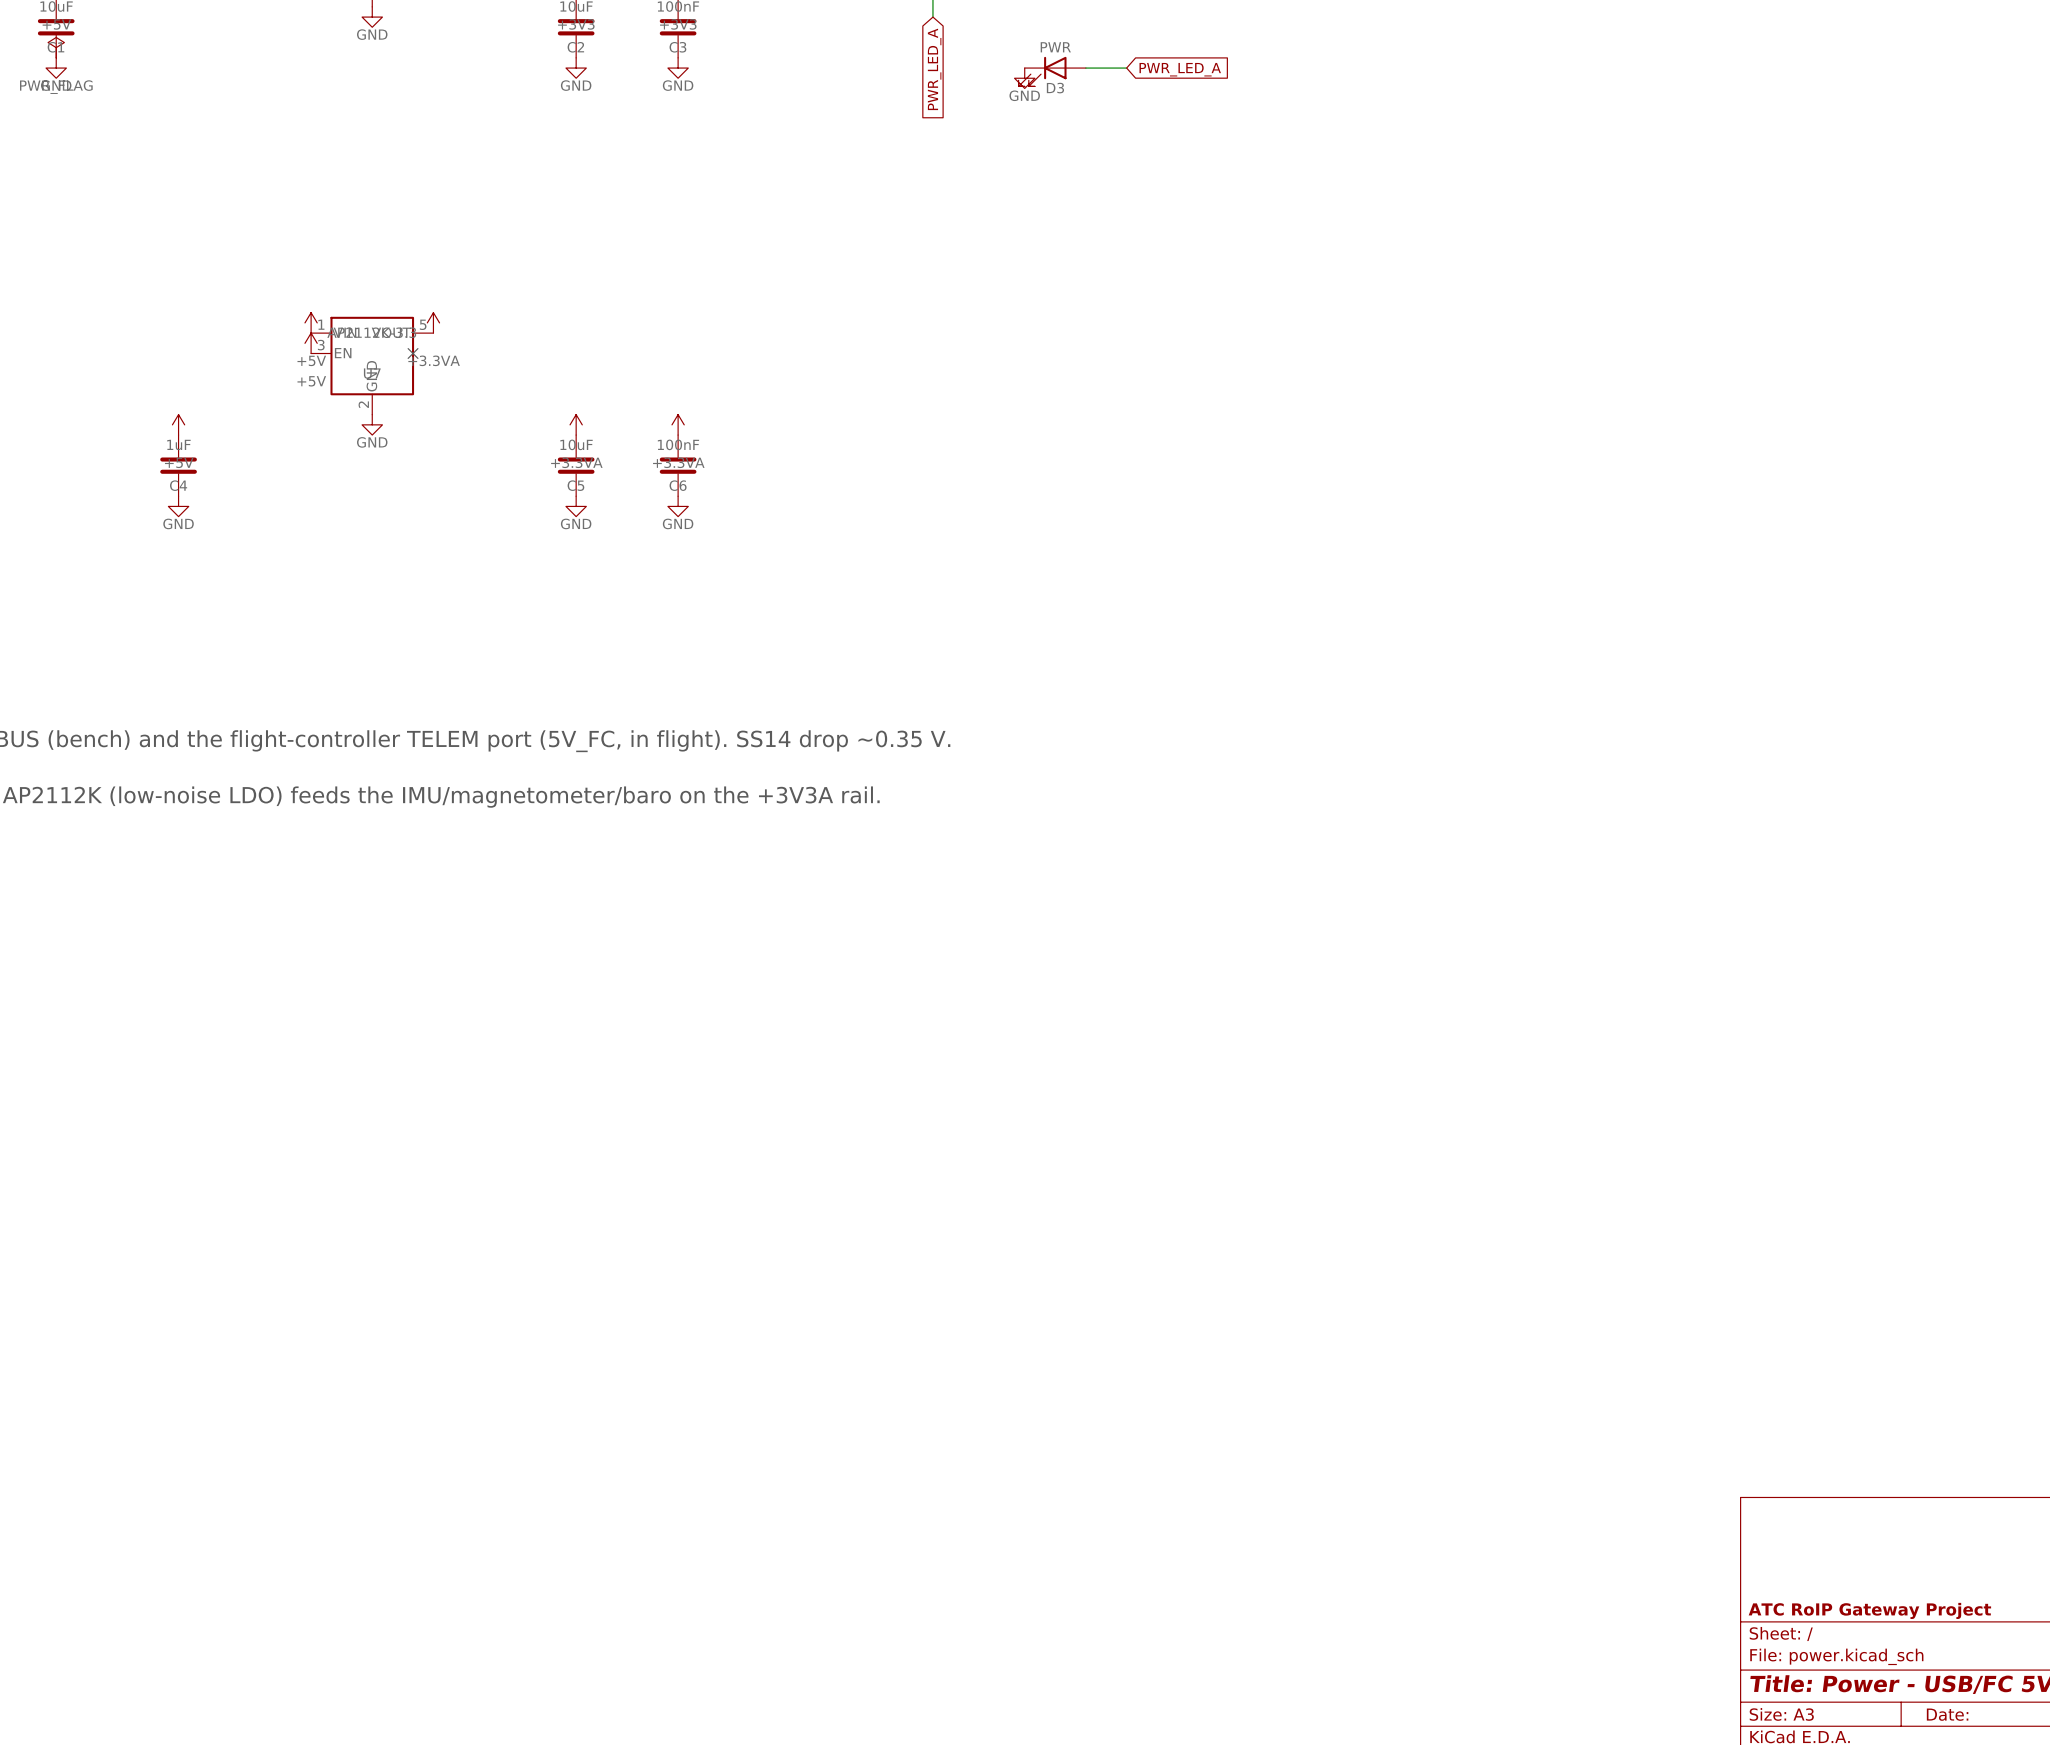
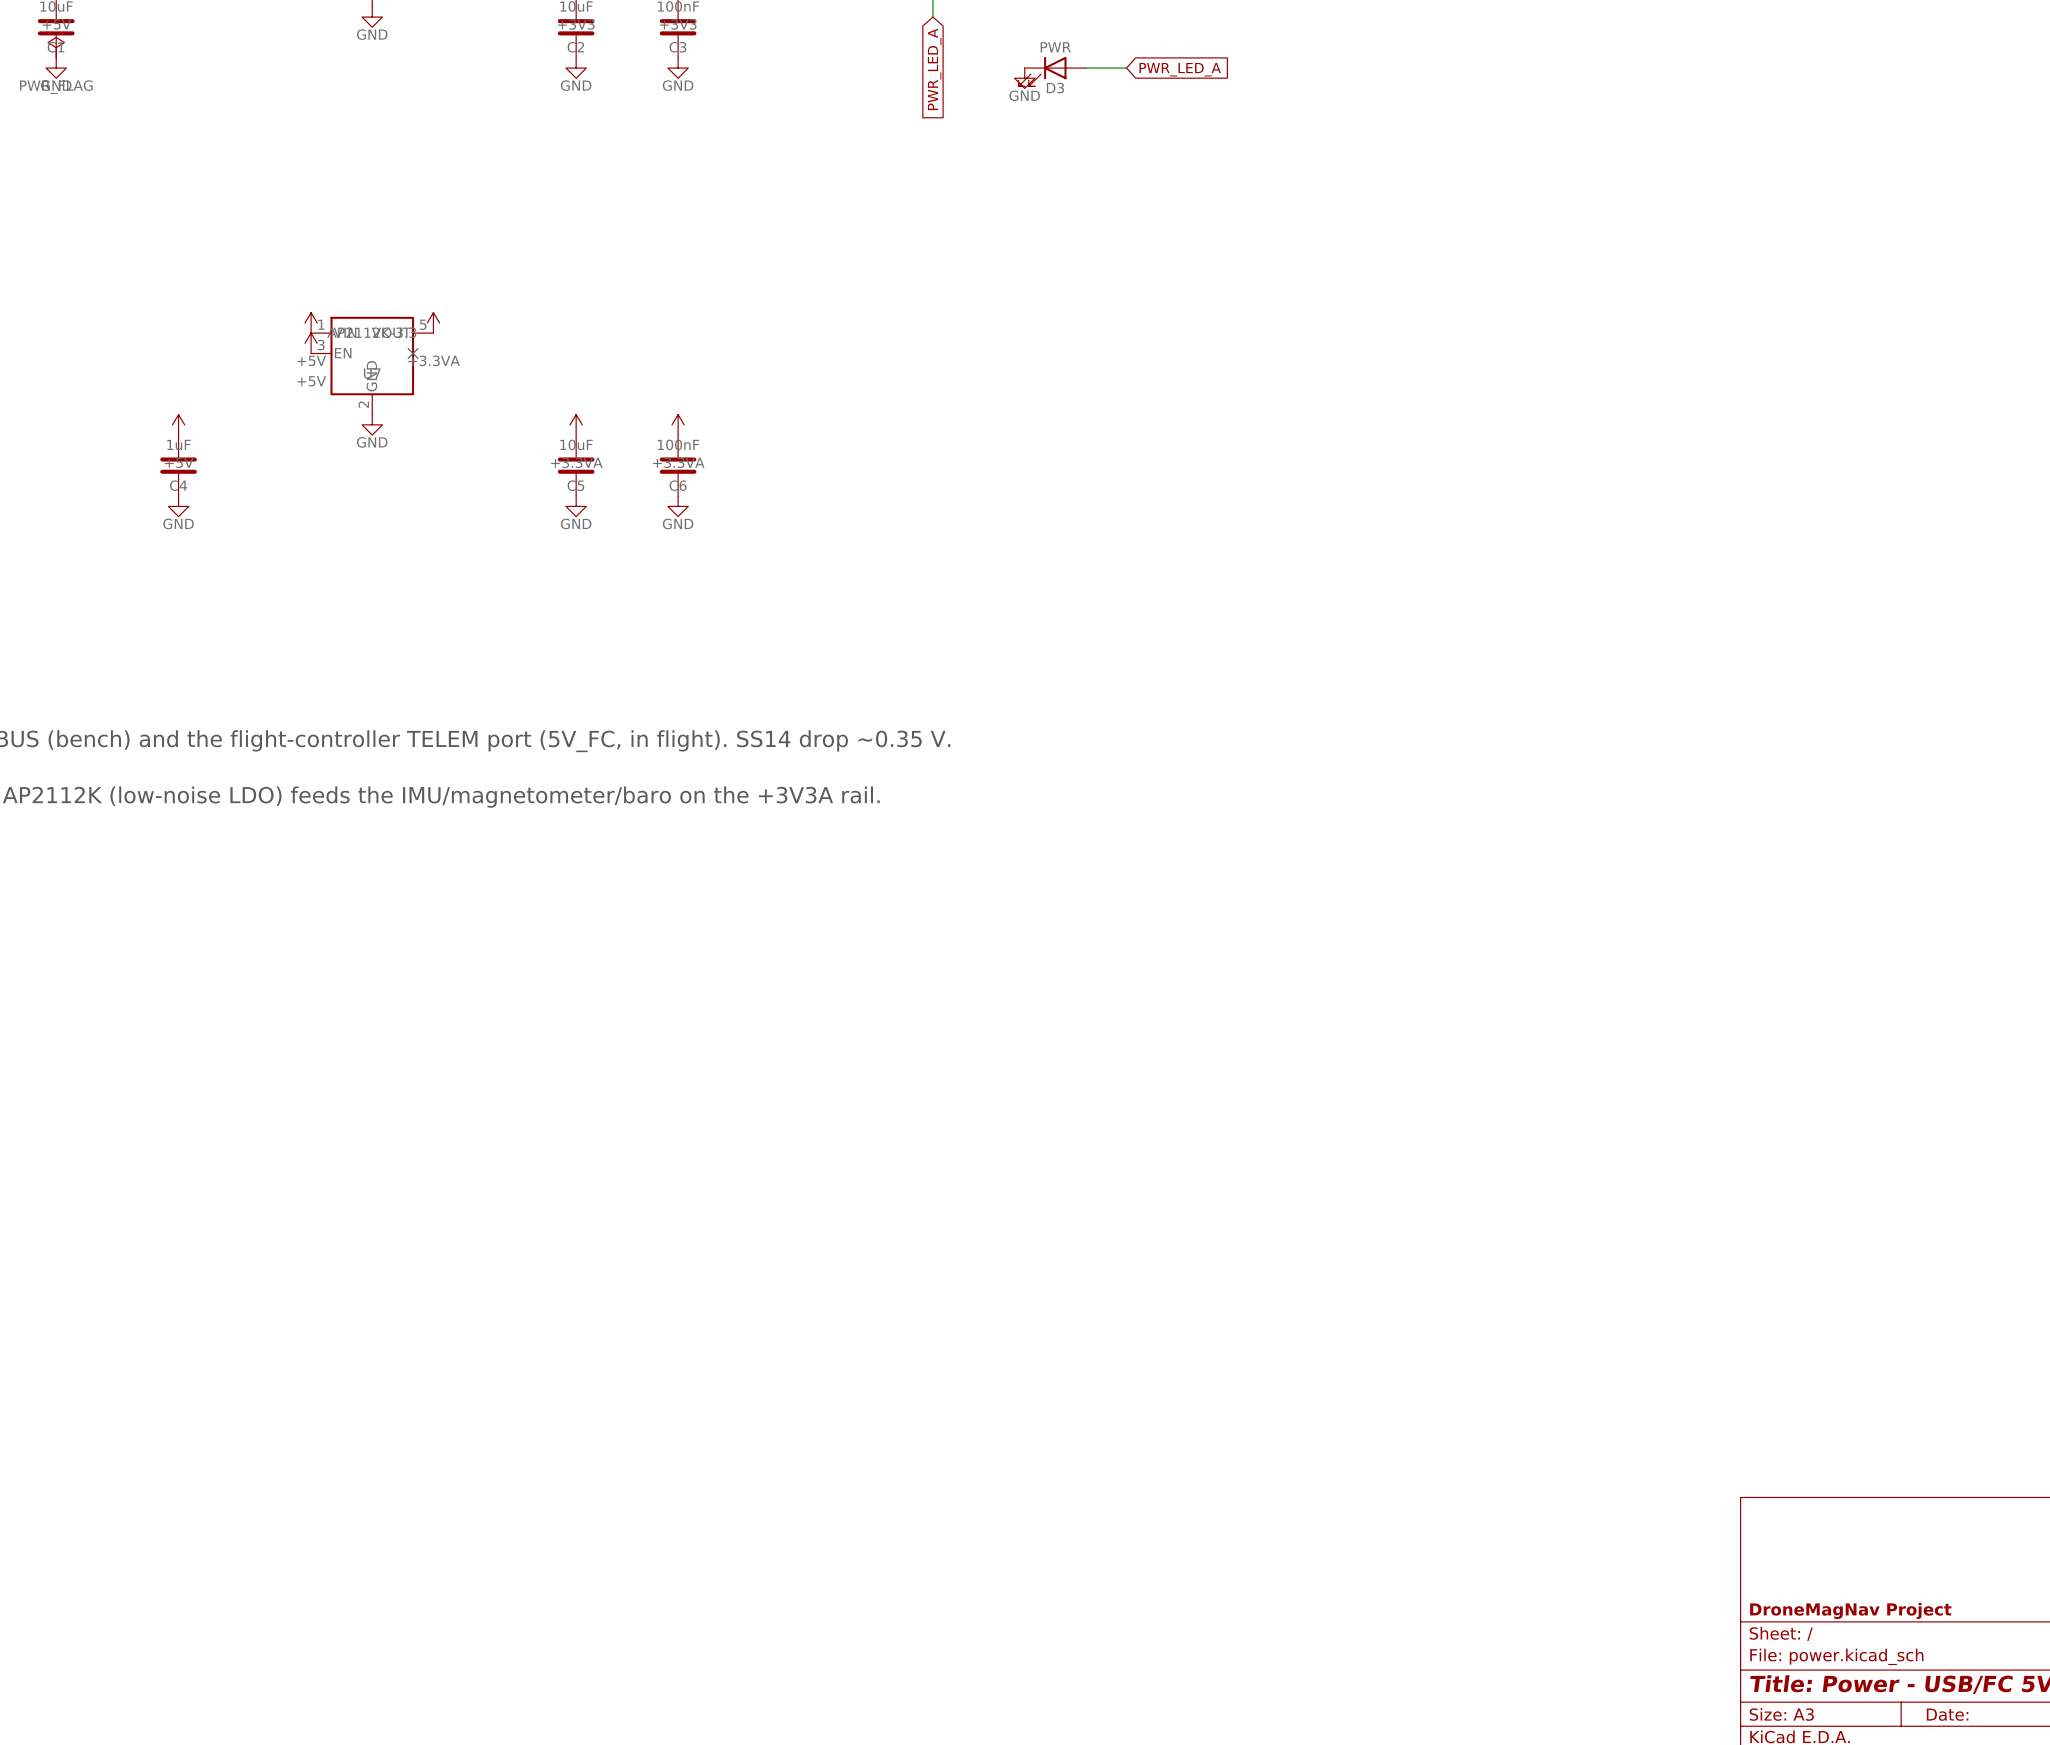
title block: ATC RoIP Gateway Project (1869, 1610) -> DroneMagNav Project (1850, 1610)

